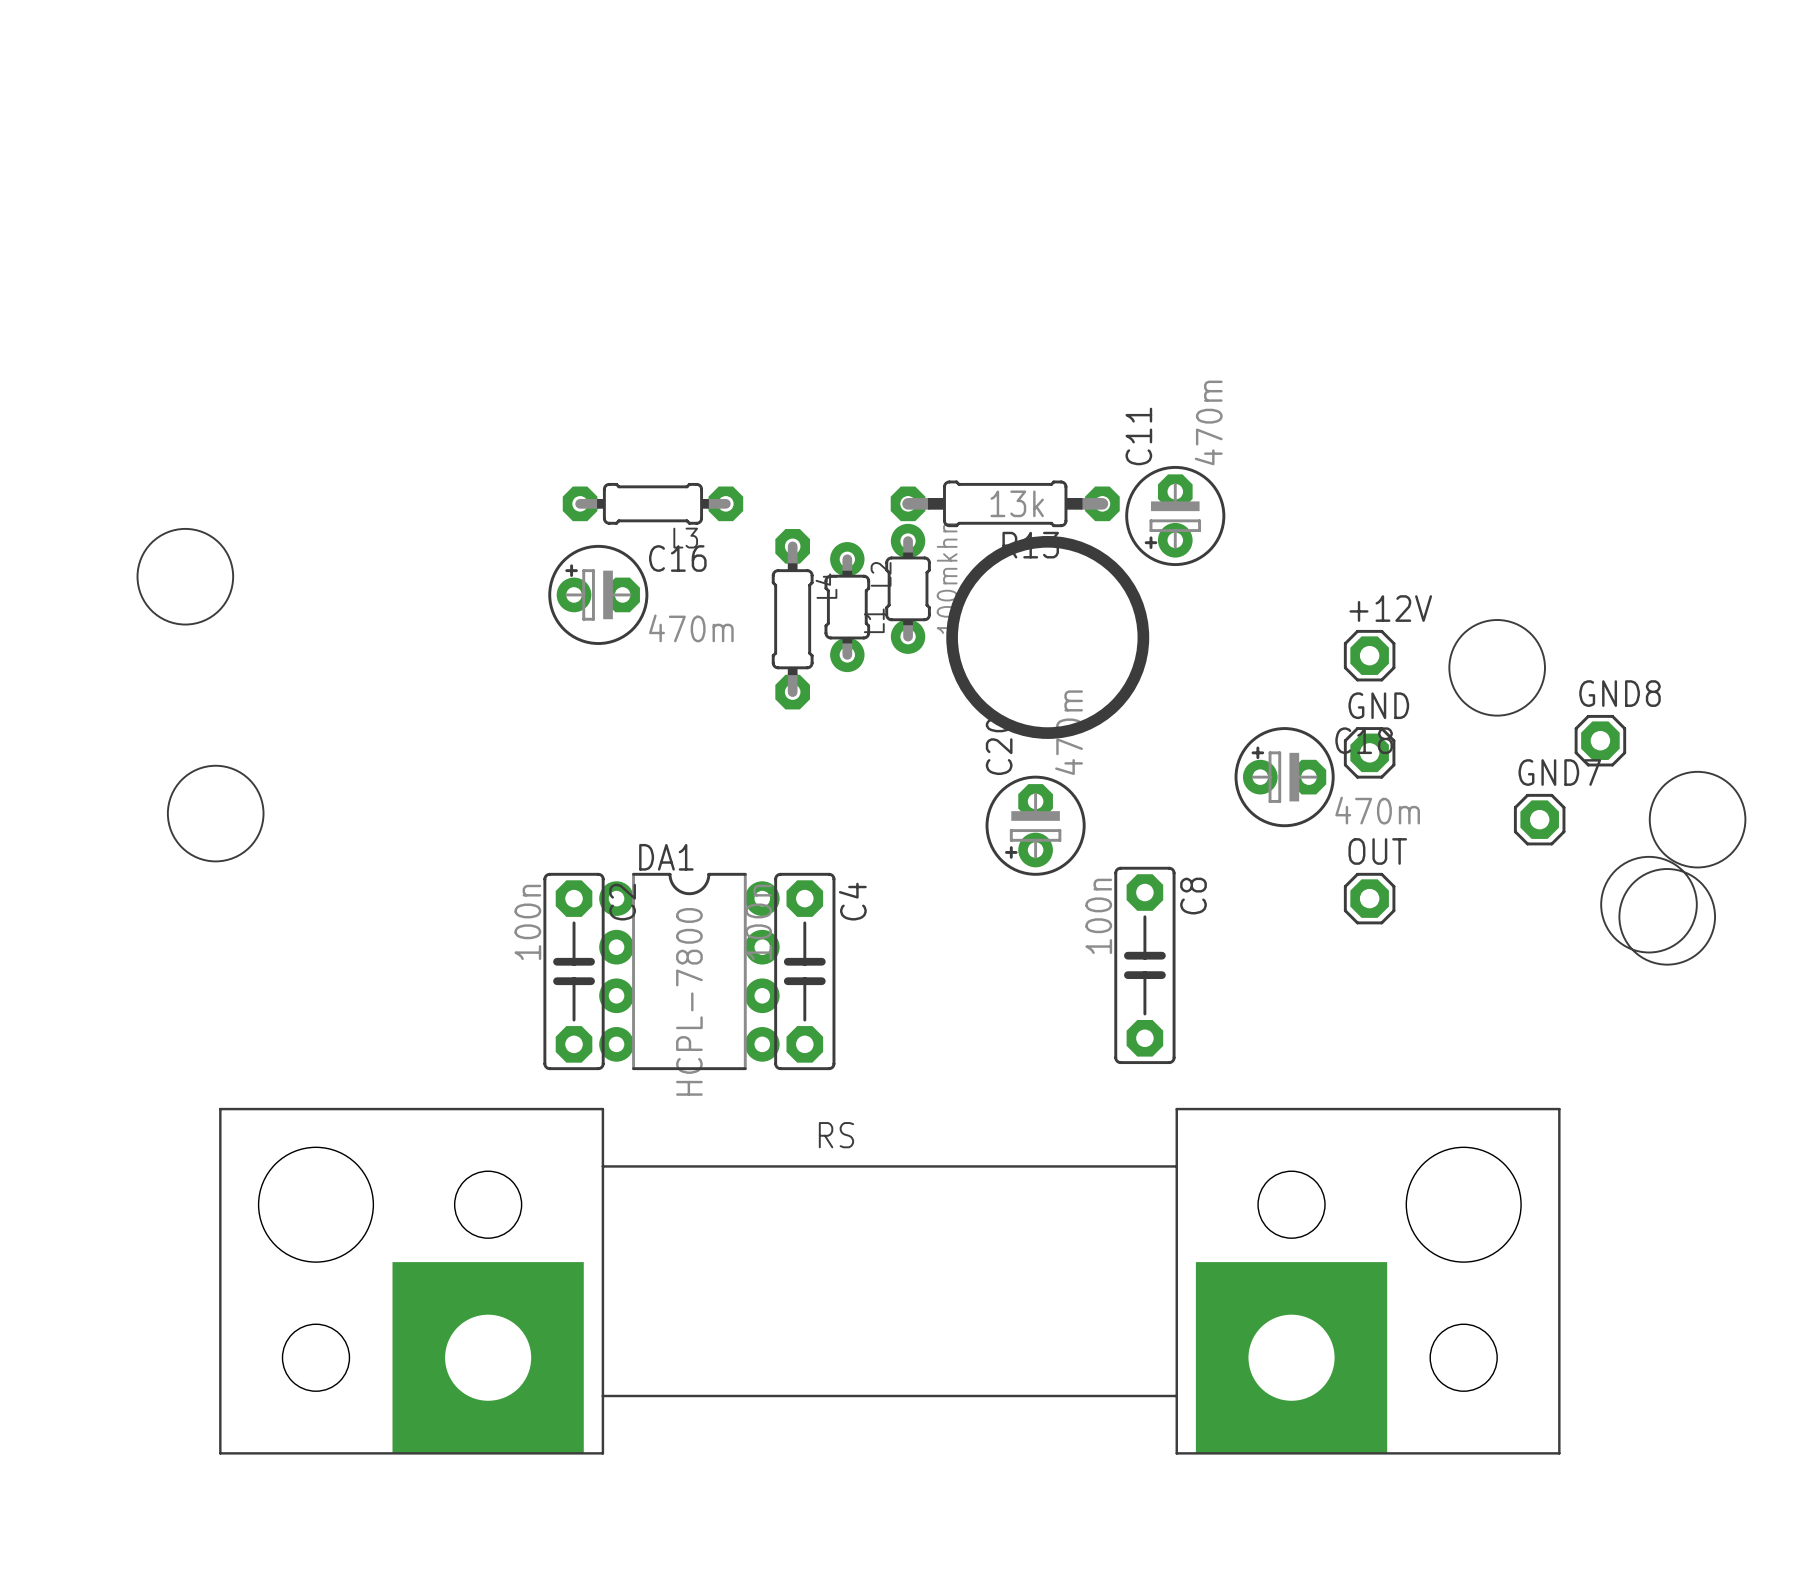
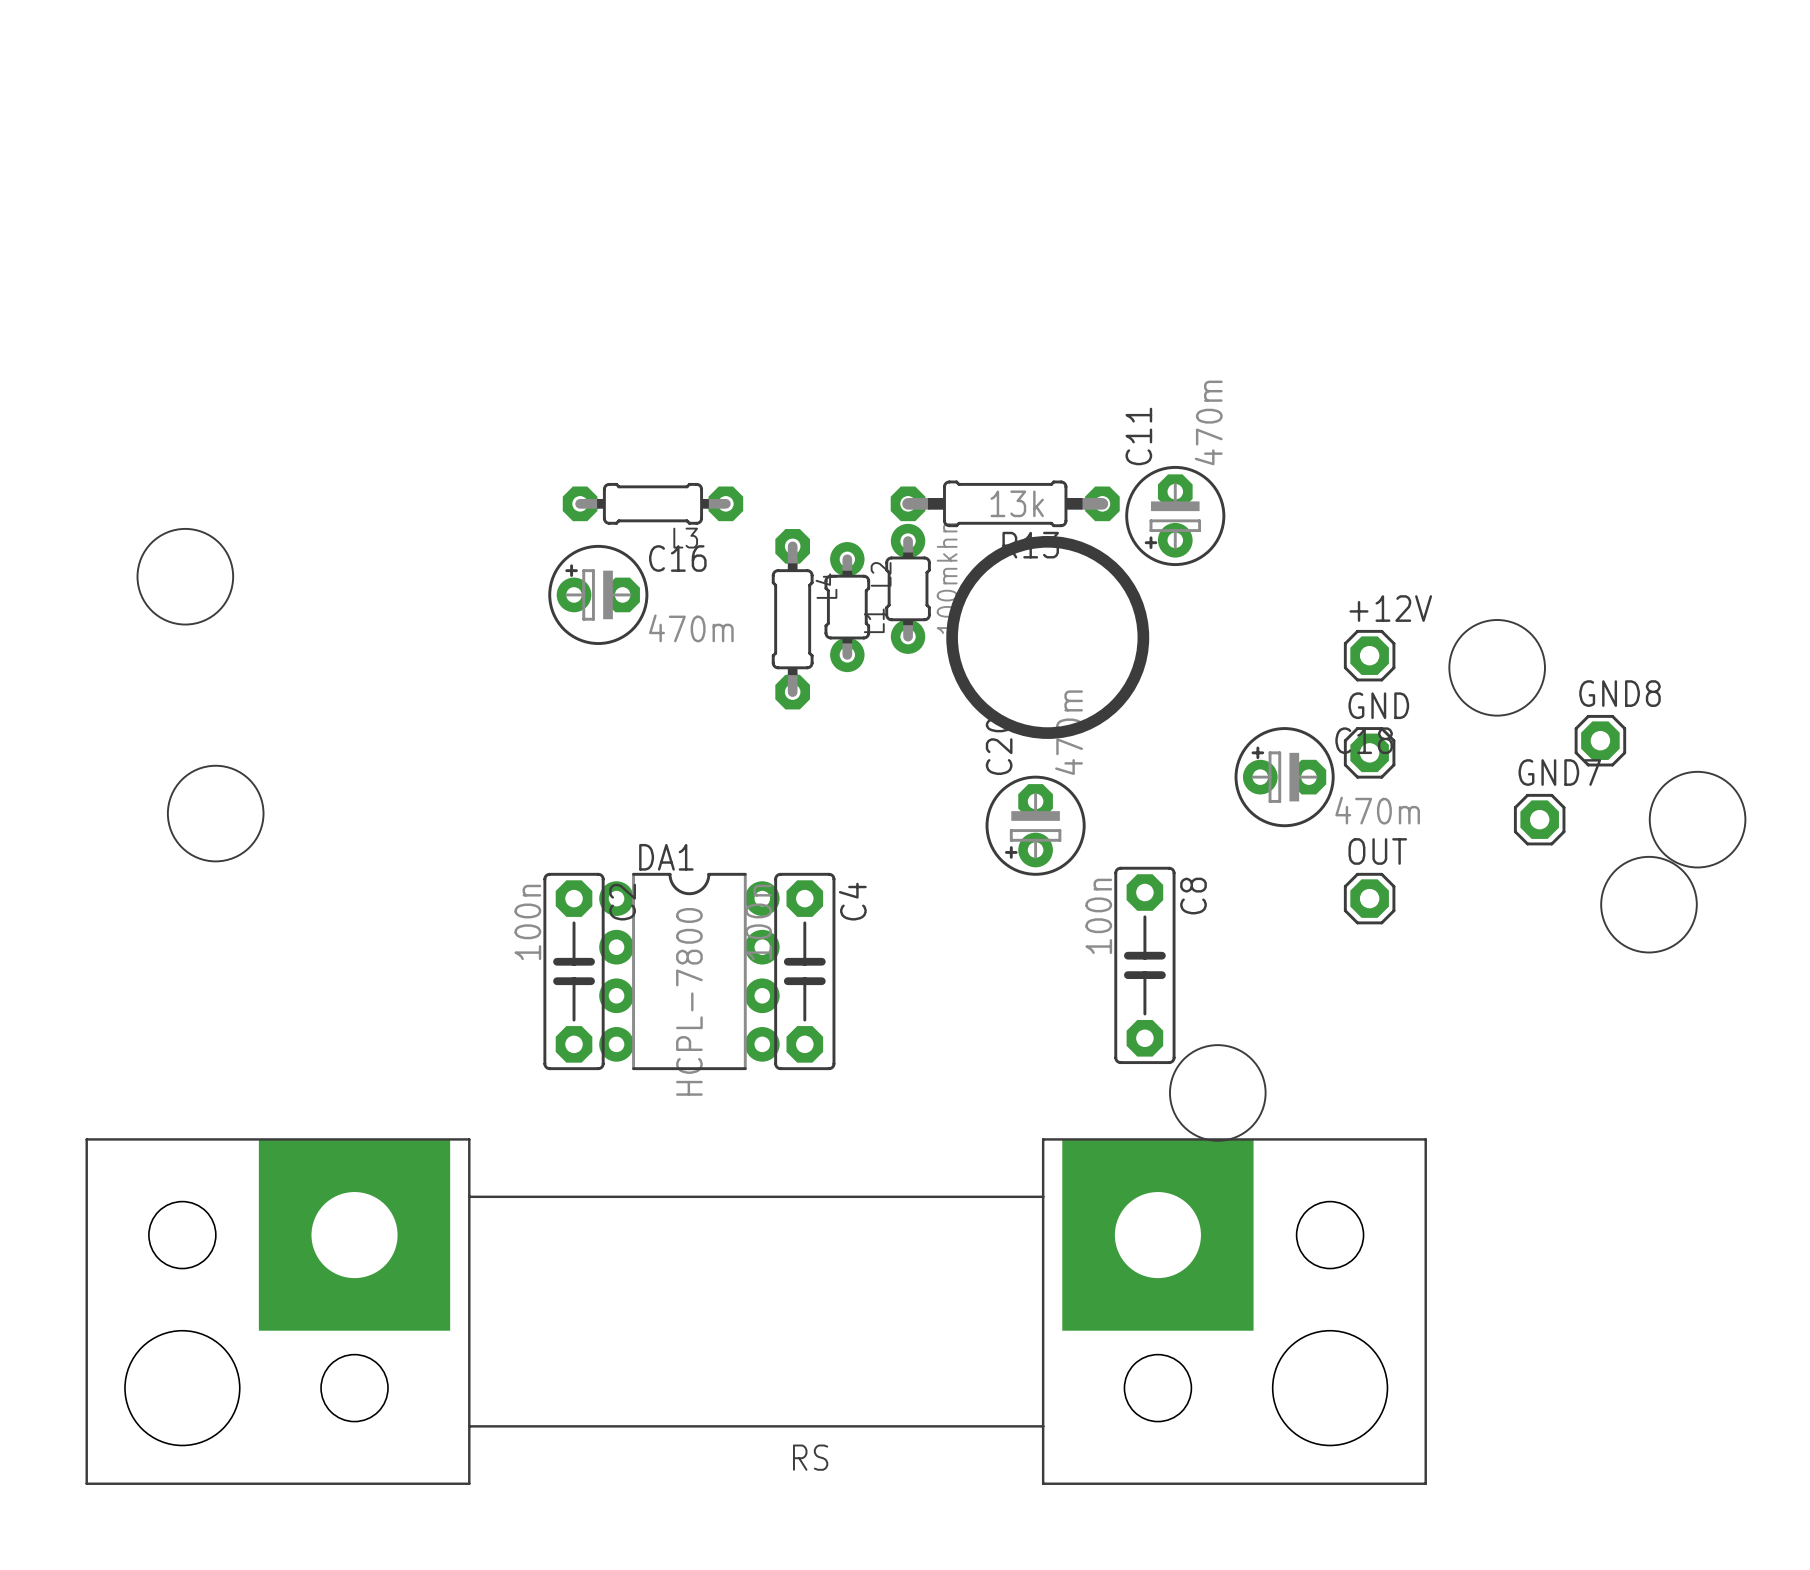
drawing: [1618, 868, 1716, 966] -> none
drawing: none -> [1169, 1044, 1267, 1142]
RS rotation: 0° (889, 1281) -> 180° (756, 1311)

